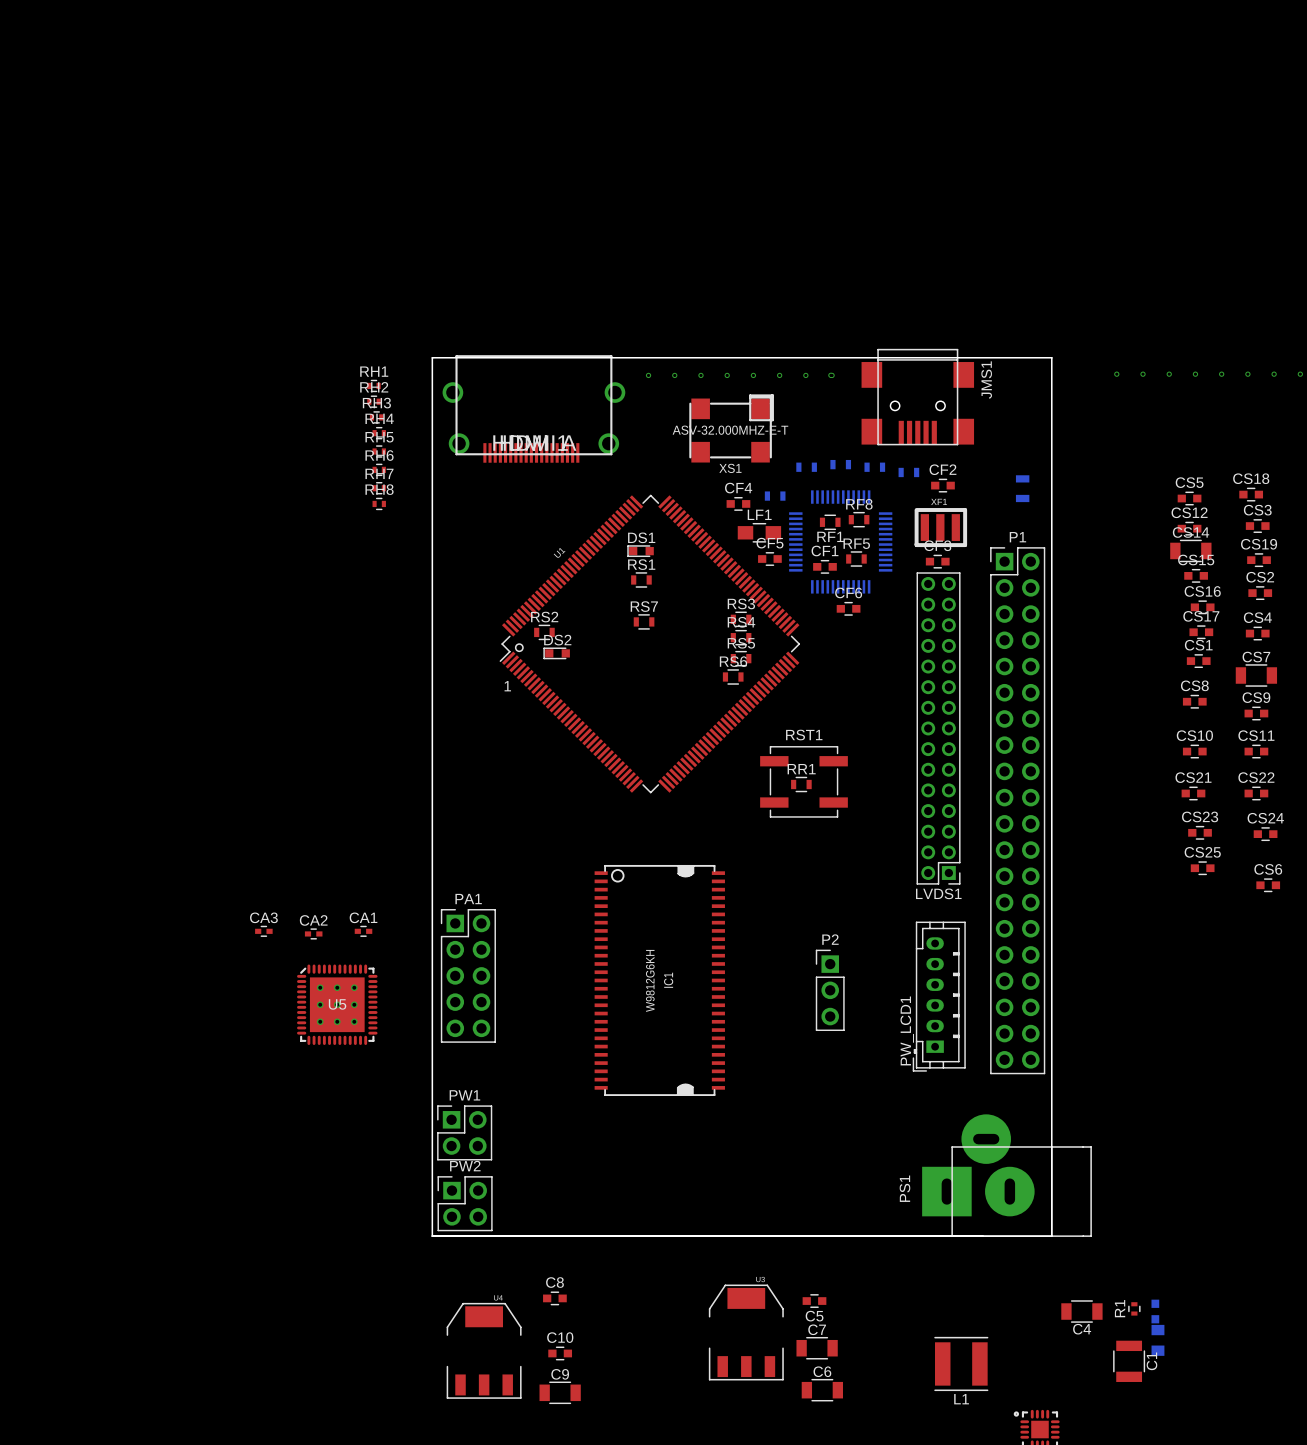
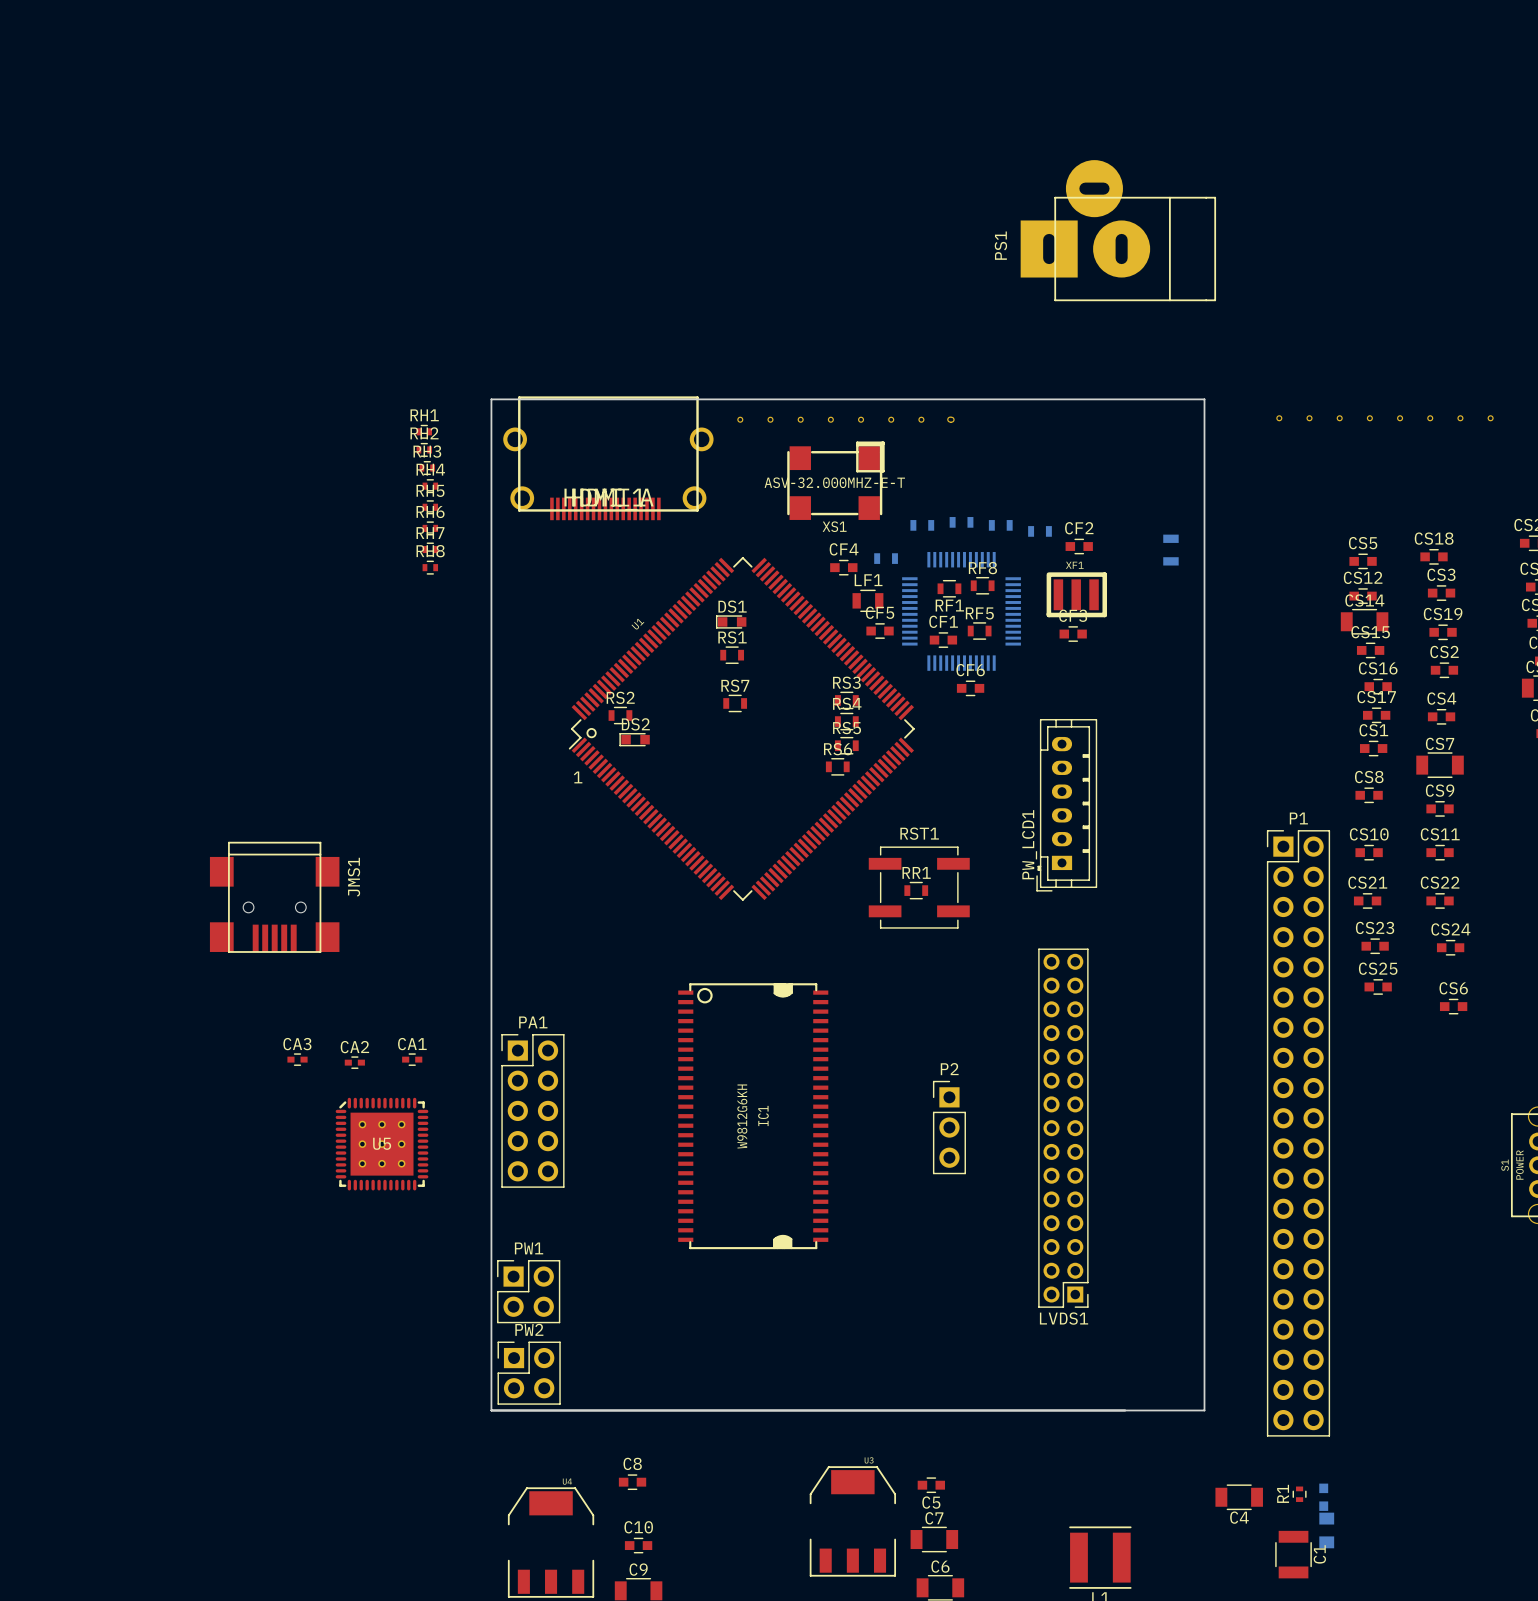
JMS1 position: (917, 397) -> (274, 897)
LF1 footprint: [737, 523, 782, 543] -> [852, 589, 884, 613]
LVDS1 position: (938, 728) -> (1063, 1128)
P1 position: (1017, 810) -> (1298, 1133)
PW_LCD1 position: (939, 996) -> (1066, 805)
PS1 position: (1007, 1175) -> (1118, 230)

